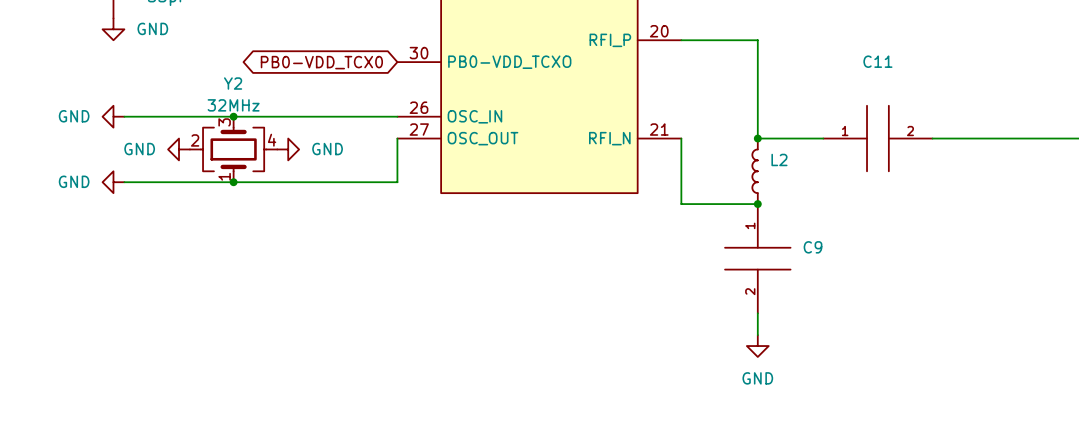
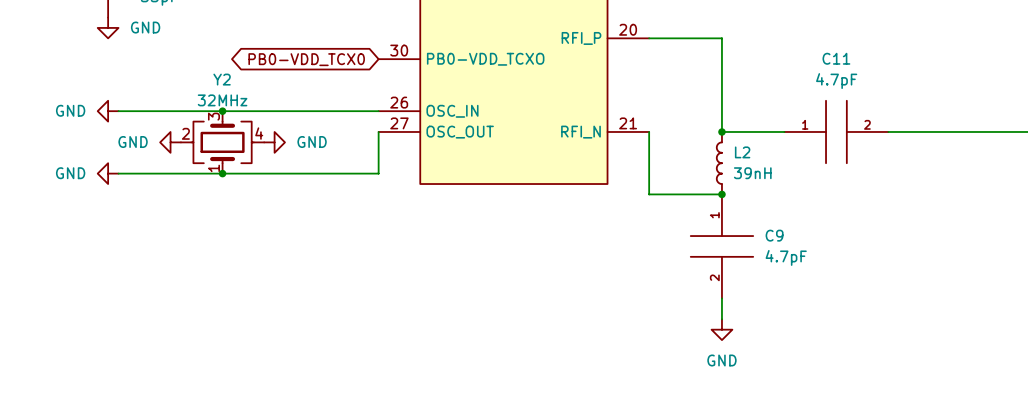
C11 value: none -> 4.7pF (836, 81)
L2 value: none -> 39nH (752, 173)
C9 value: none -> 4.7pF (786, 257)

